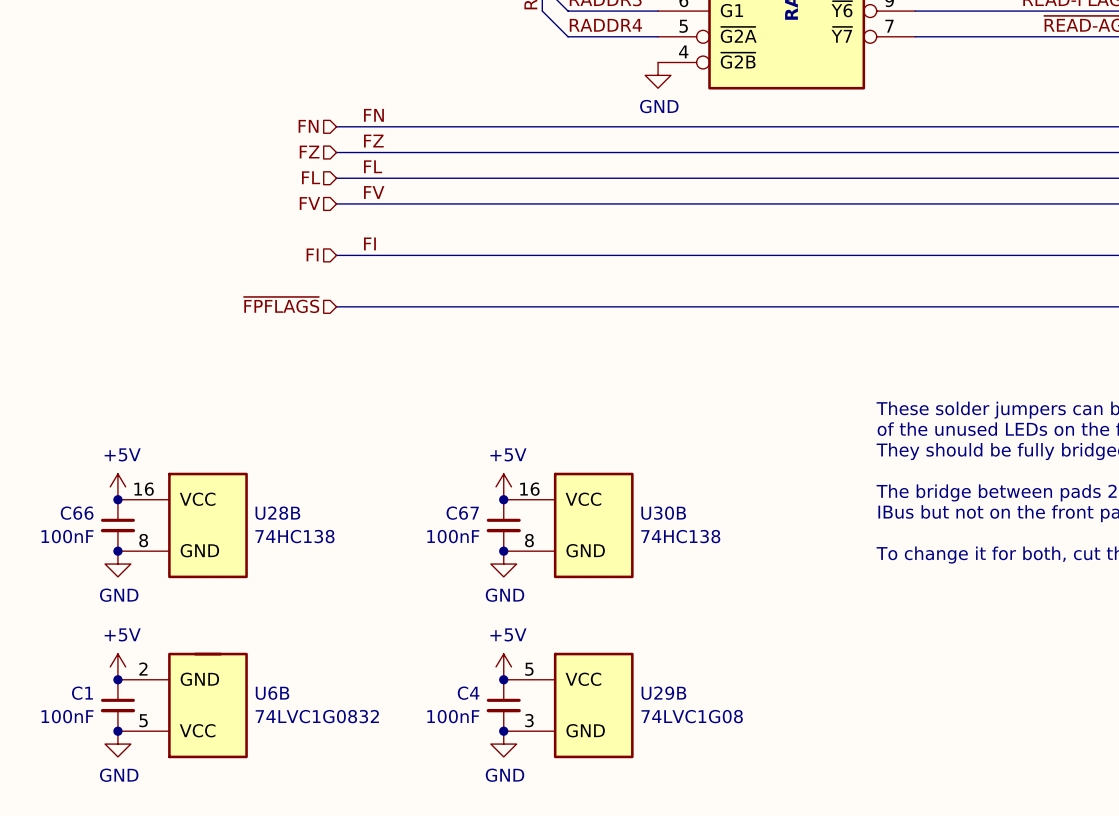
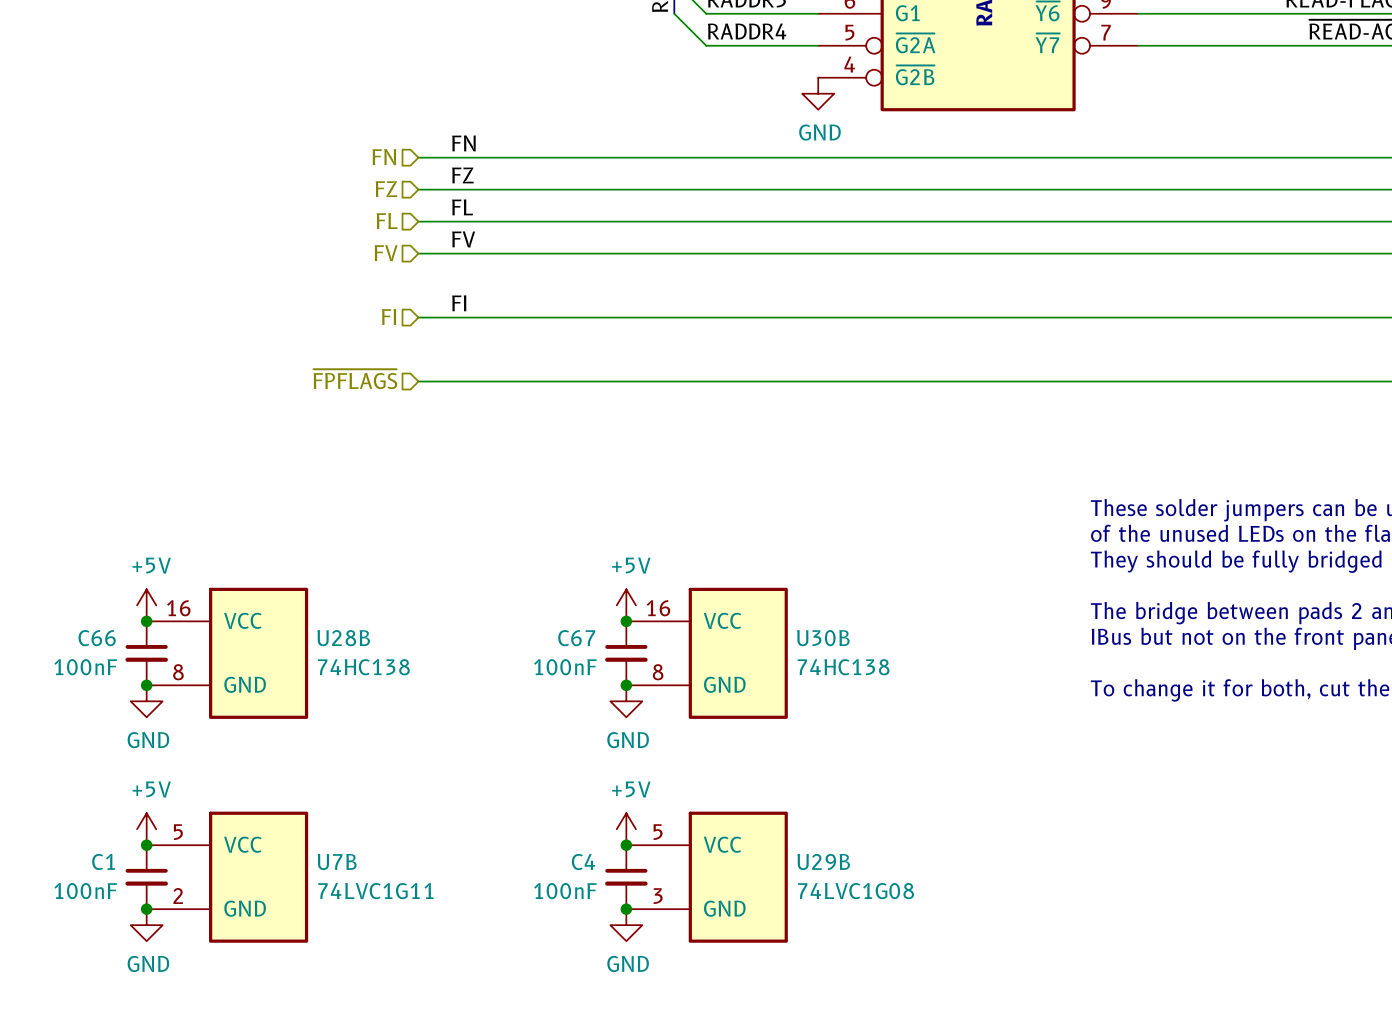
U6B: 74LVC1G0832 (182, 705) -> none
U7B: none -> 74LVC1G11 (227, 877)

